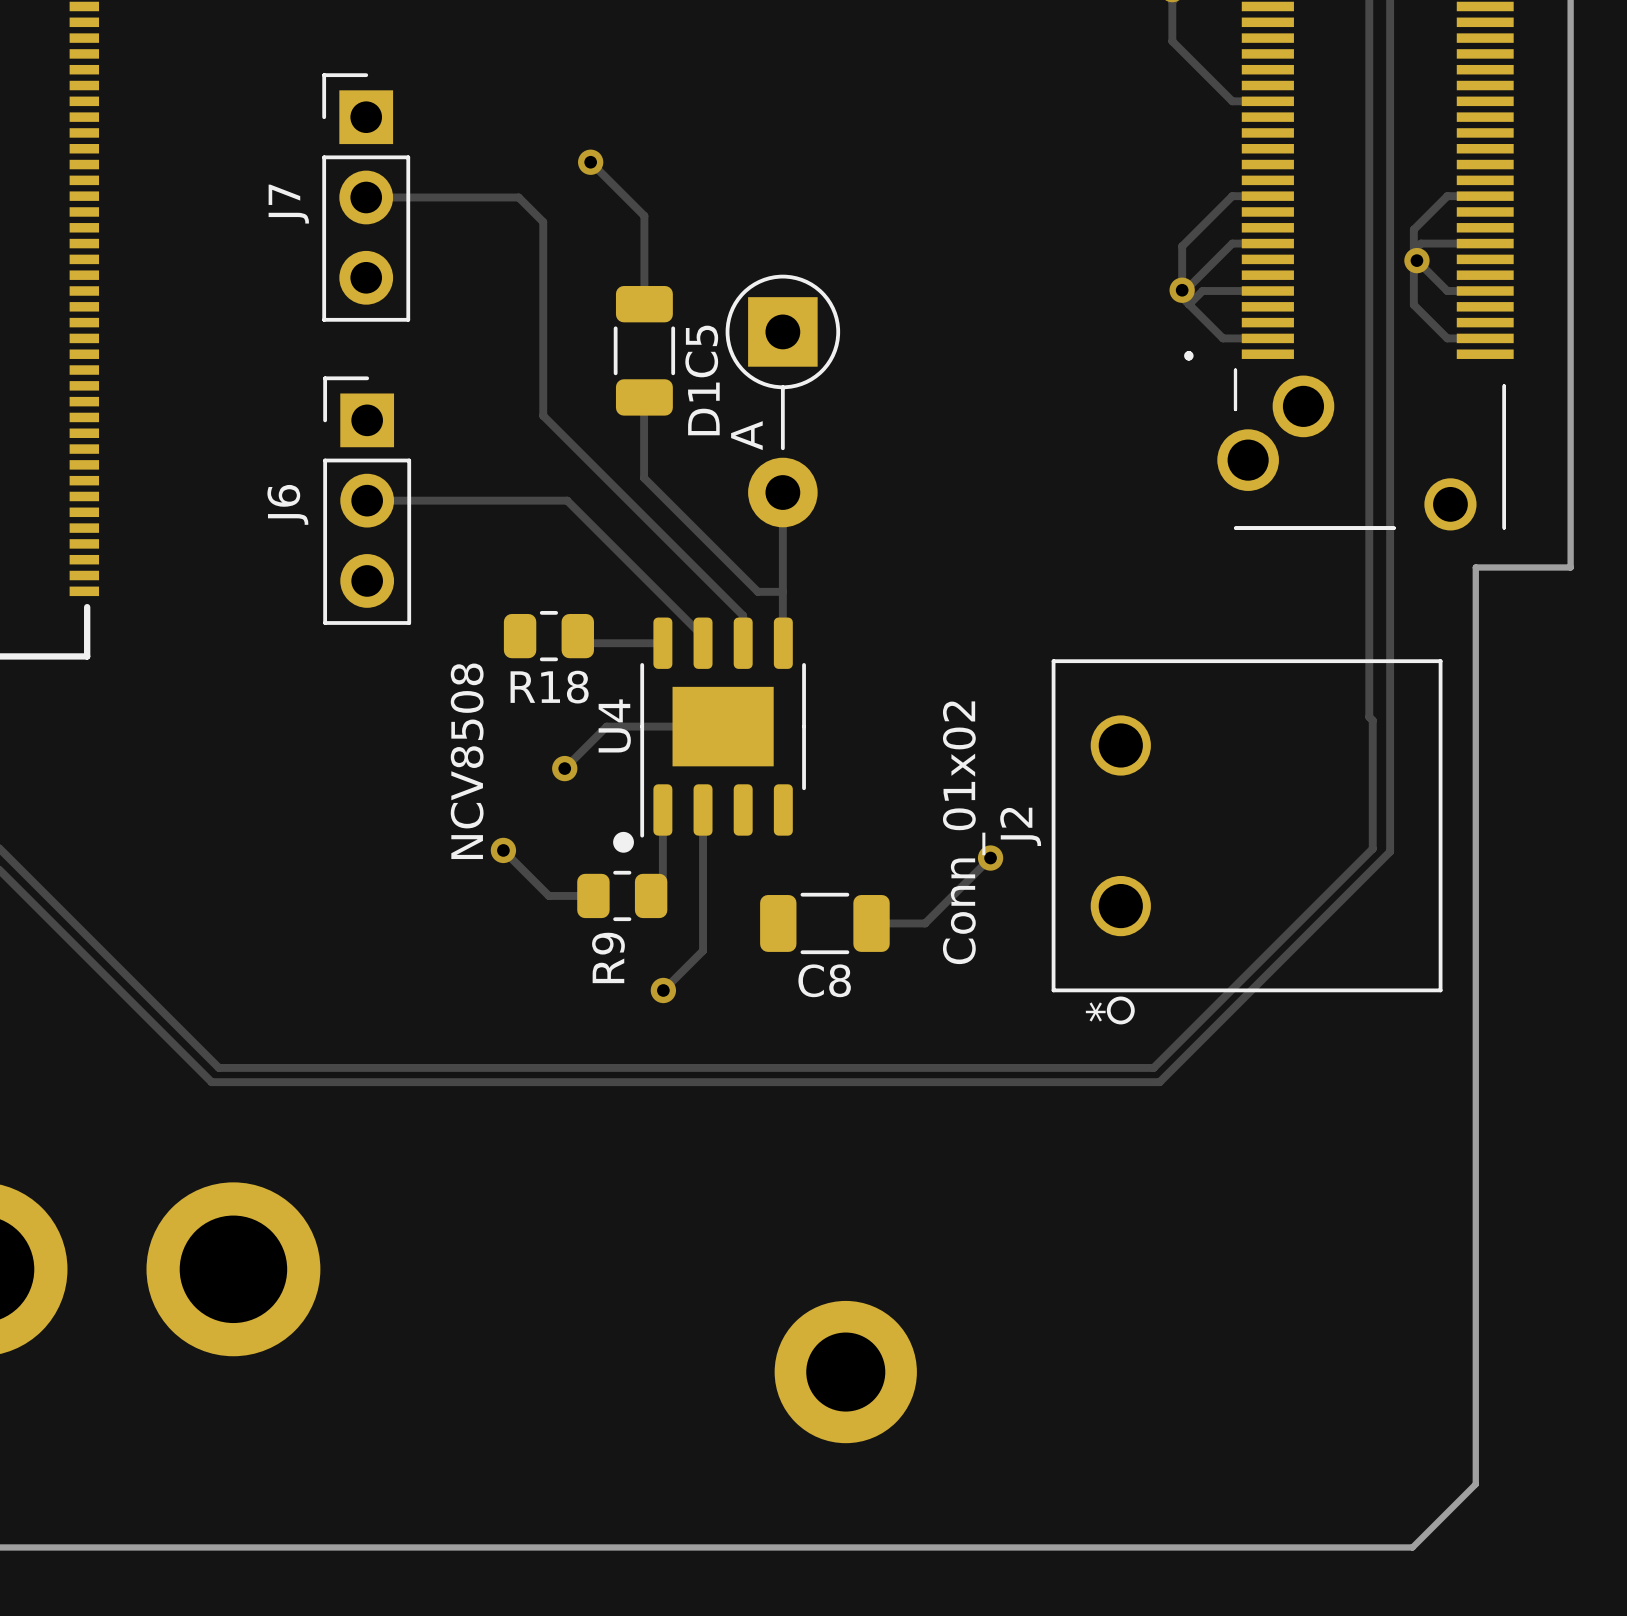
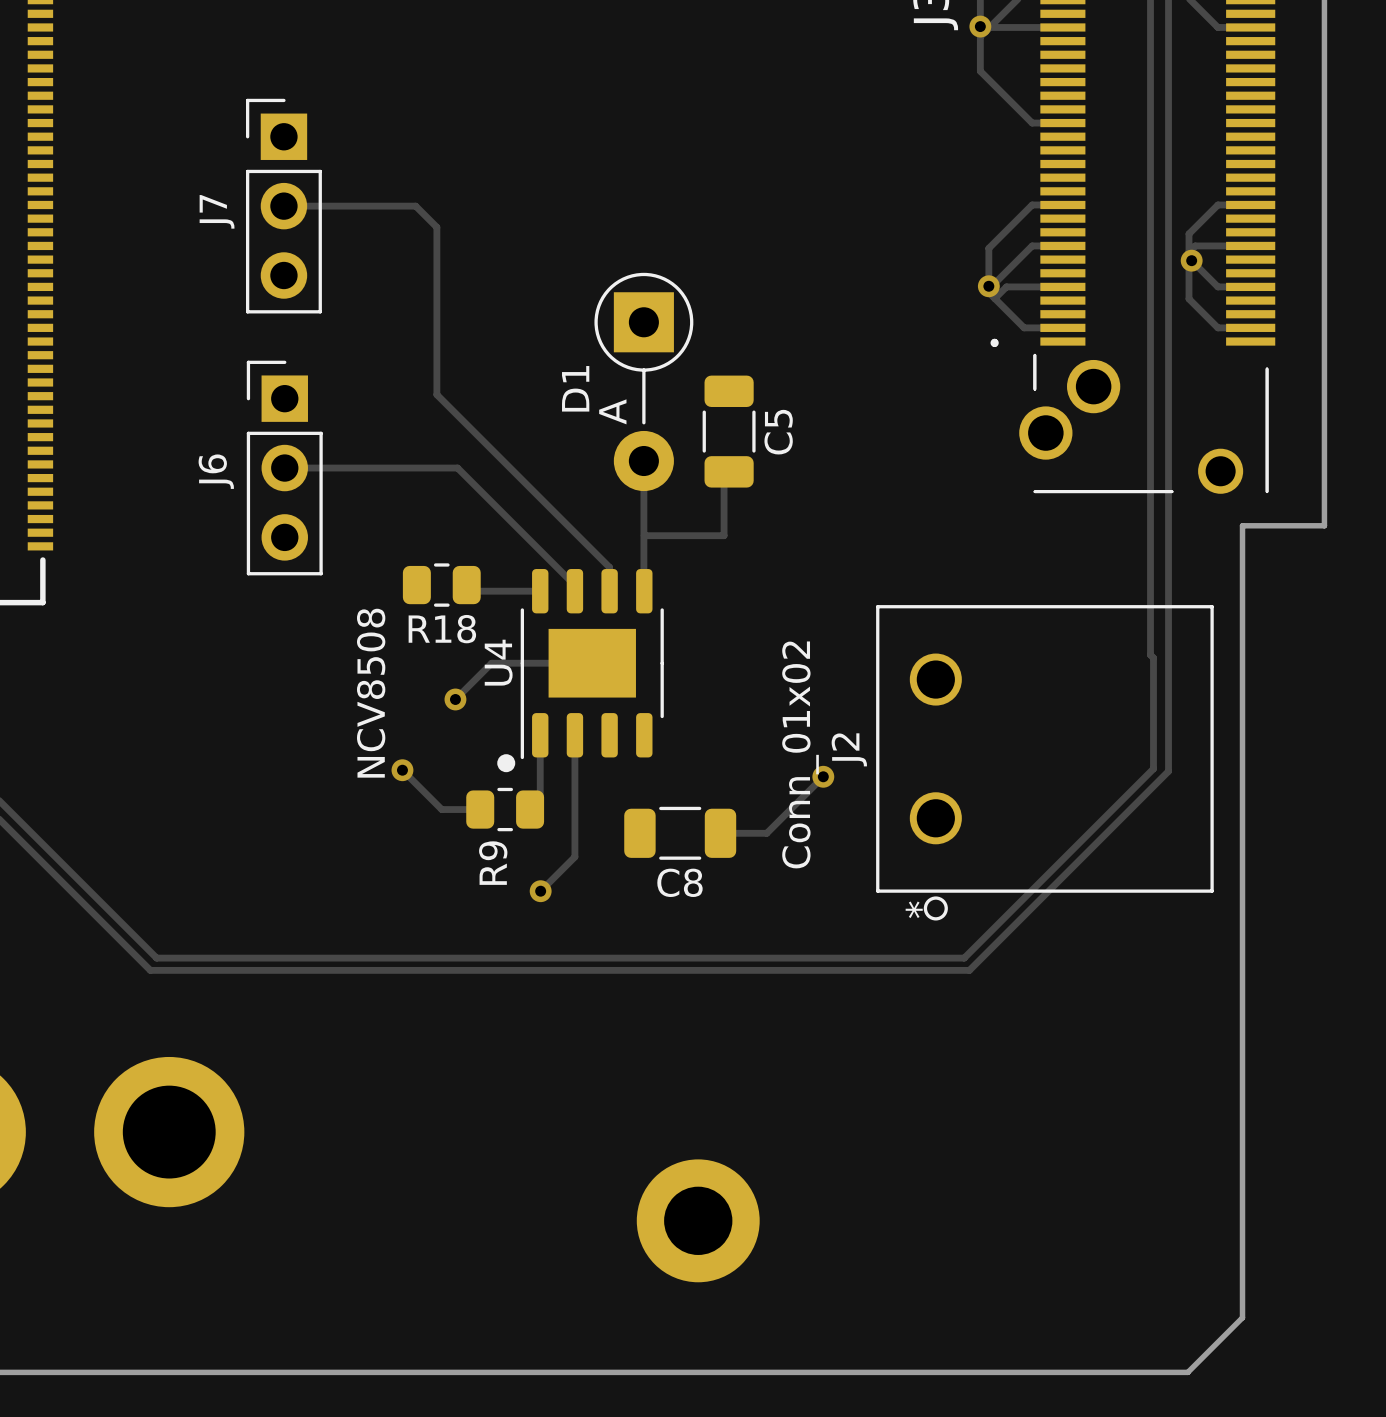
track: (590, 162) (644, 215) (644, 304) -> none
via: (590, 162) -> none
C5 position: (644, 350) -> (729, 431)
track: (644, 397) (644, 478) (757, 591) (782, 591) -> none
track: none -> (729, 471) (724, 476) (724, 535) (644, 535)

